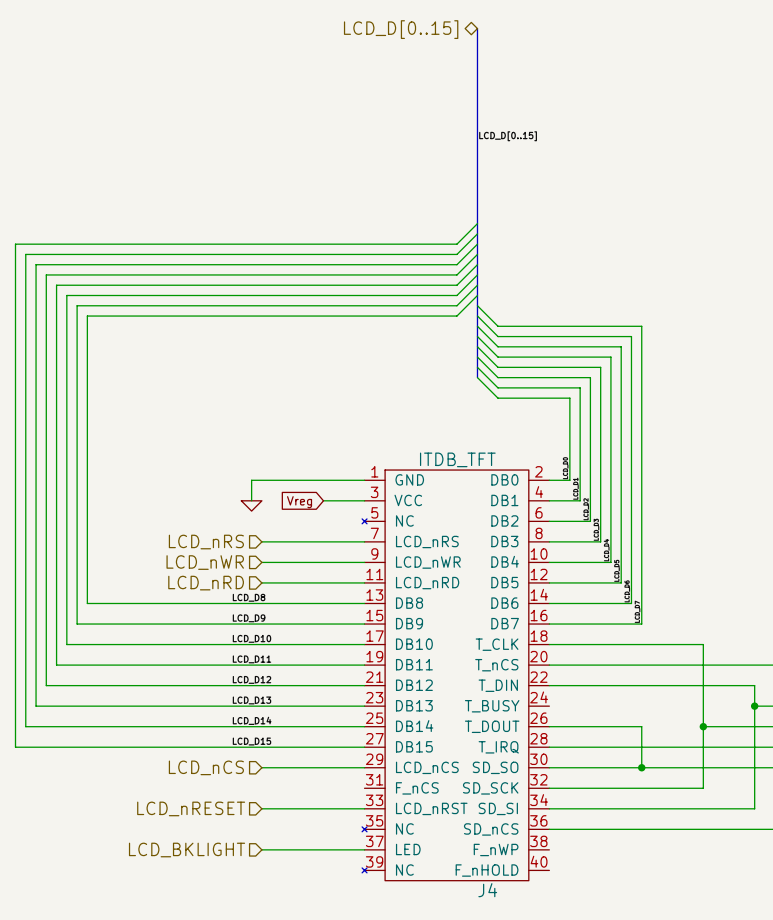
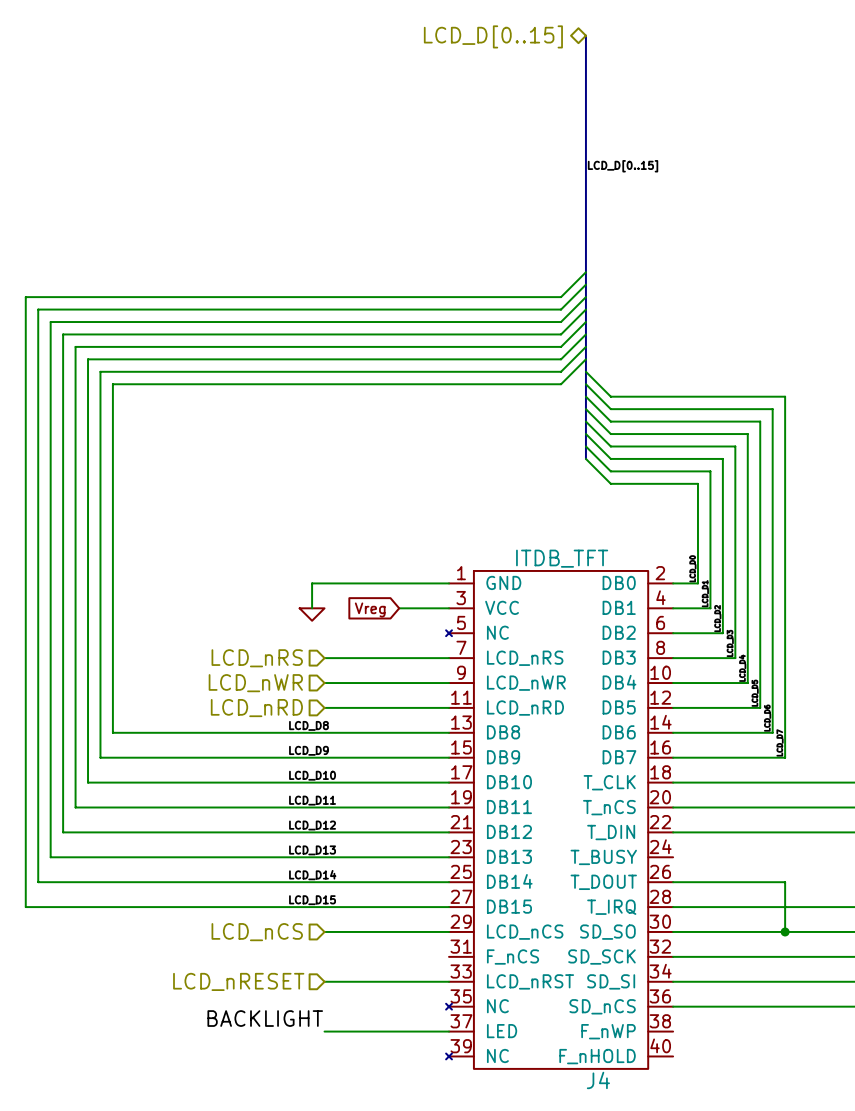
label: none -> BACKLIGHT (265, 1018)
hierarchical label: LCD_BKLIGHT (187, 850) -> none

